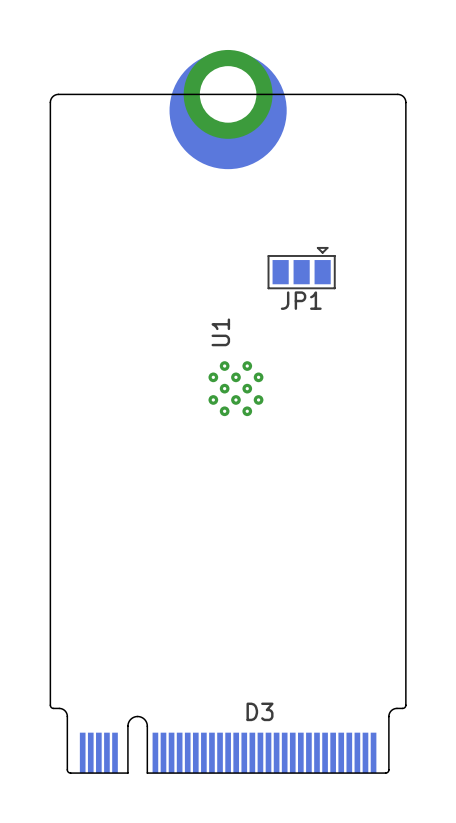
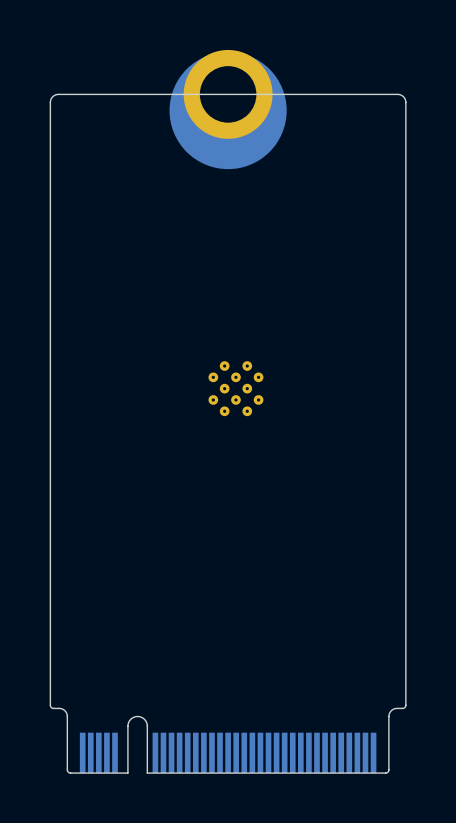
JP1: (301, 268) -> none
U1 name: U1 (220, 332) -> none
D3: (260, 711) -> none

